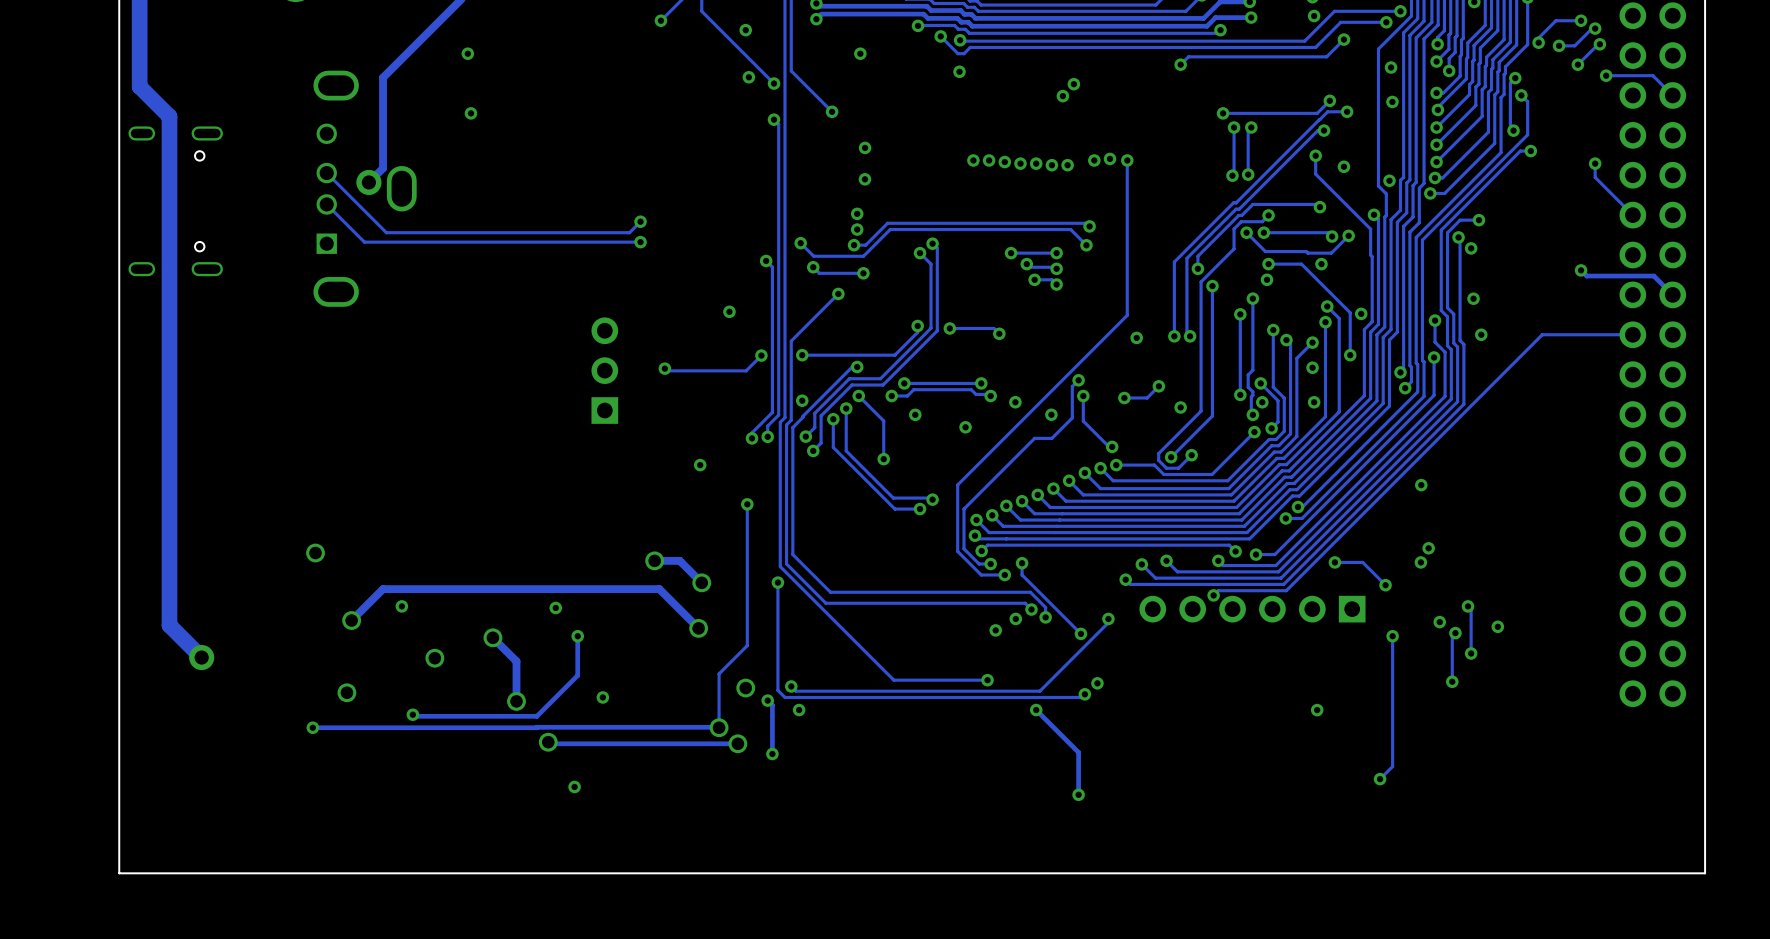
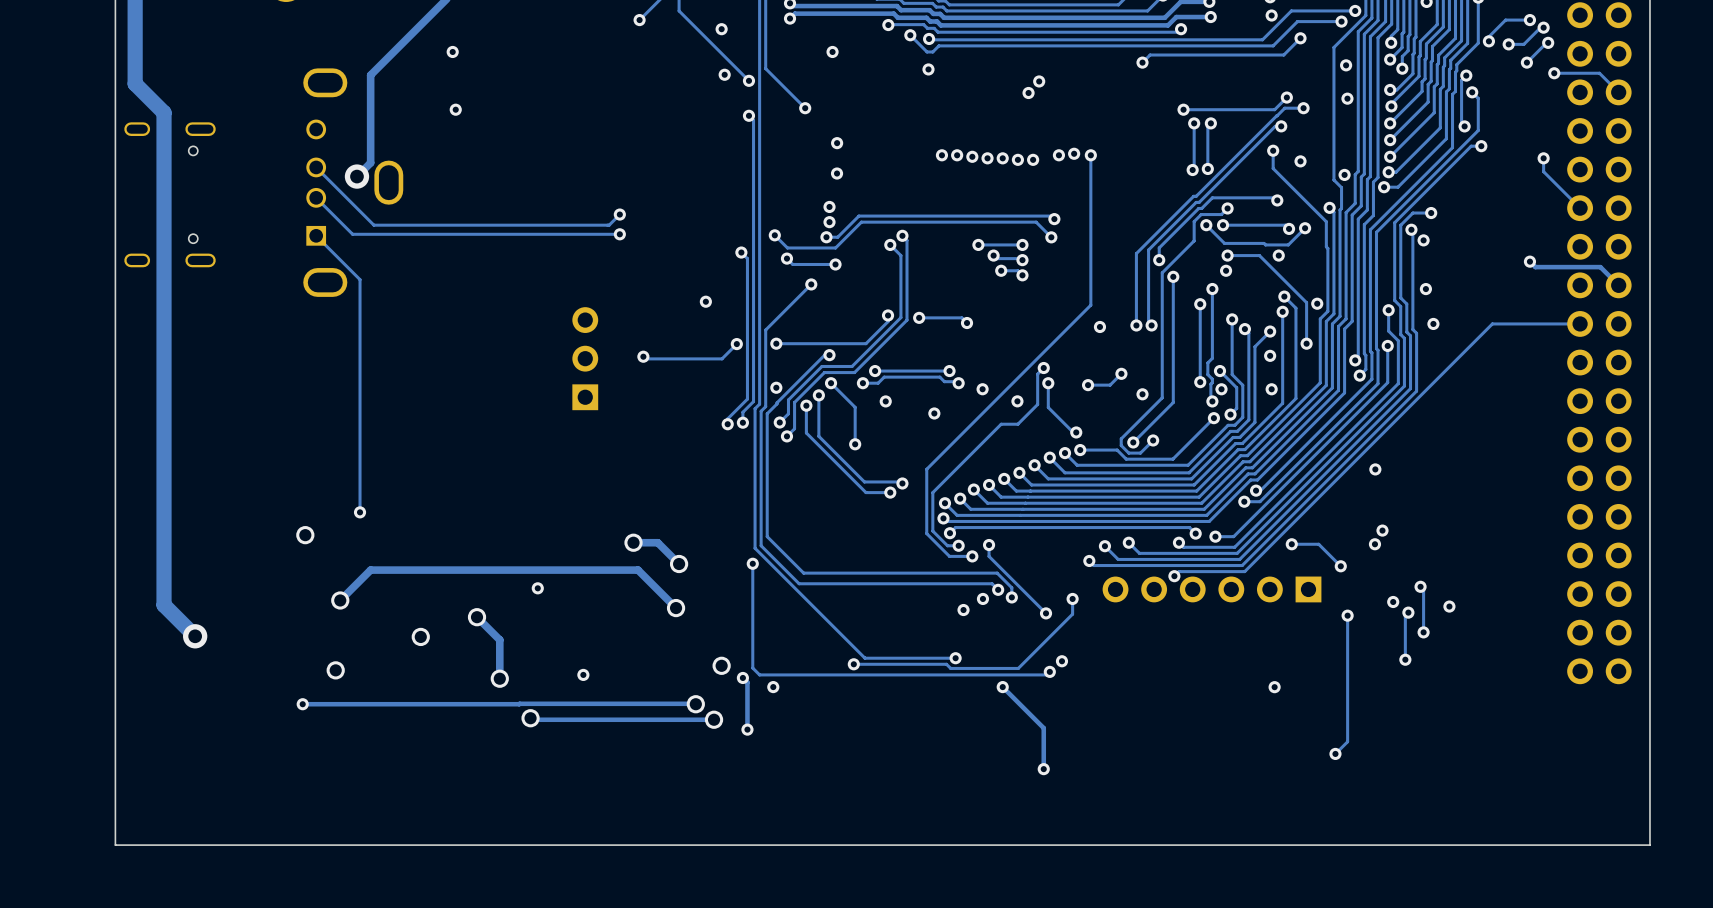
track: none -> (316, 235) (360, 279) (360, 512)
via: (700, 465) -> none
track: (747, 504) (747, 645) (719, 673) (719, 727) -> none
via: (747, 504) -> none
via position: (401, 606) -> (360, 512)
track: (1108, 622) (1039, 691) (795, 691) (791, 686) -> (1072, 602) (1072, 614) (1018, 668) (950, 668) (946, 664) (853, 664)
track: (577, 636) (577, 675) (536, 716) (414, 716) (412, 714) -> none
via: (577, 636) -> none
via position: (791, 686) -> (853, 664)
via: (412, 714) -> none
via: (574, 786) -> none

